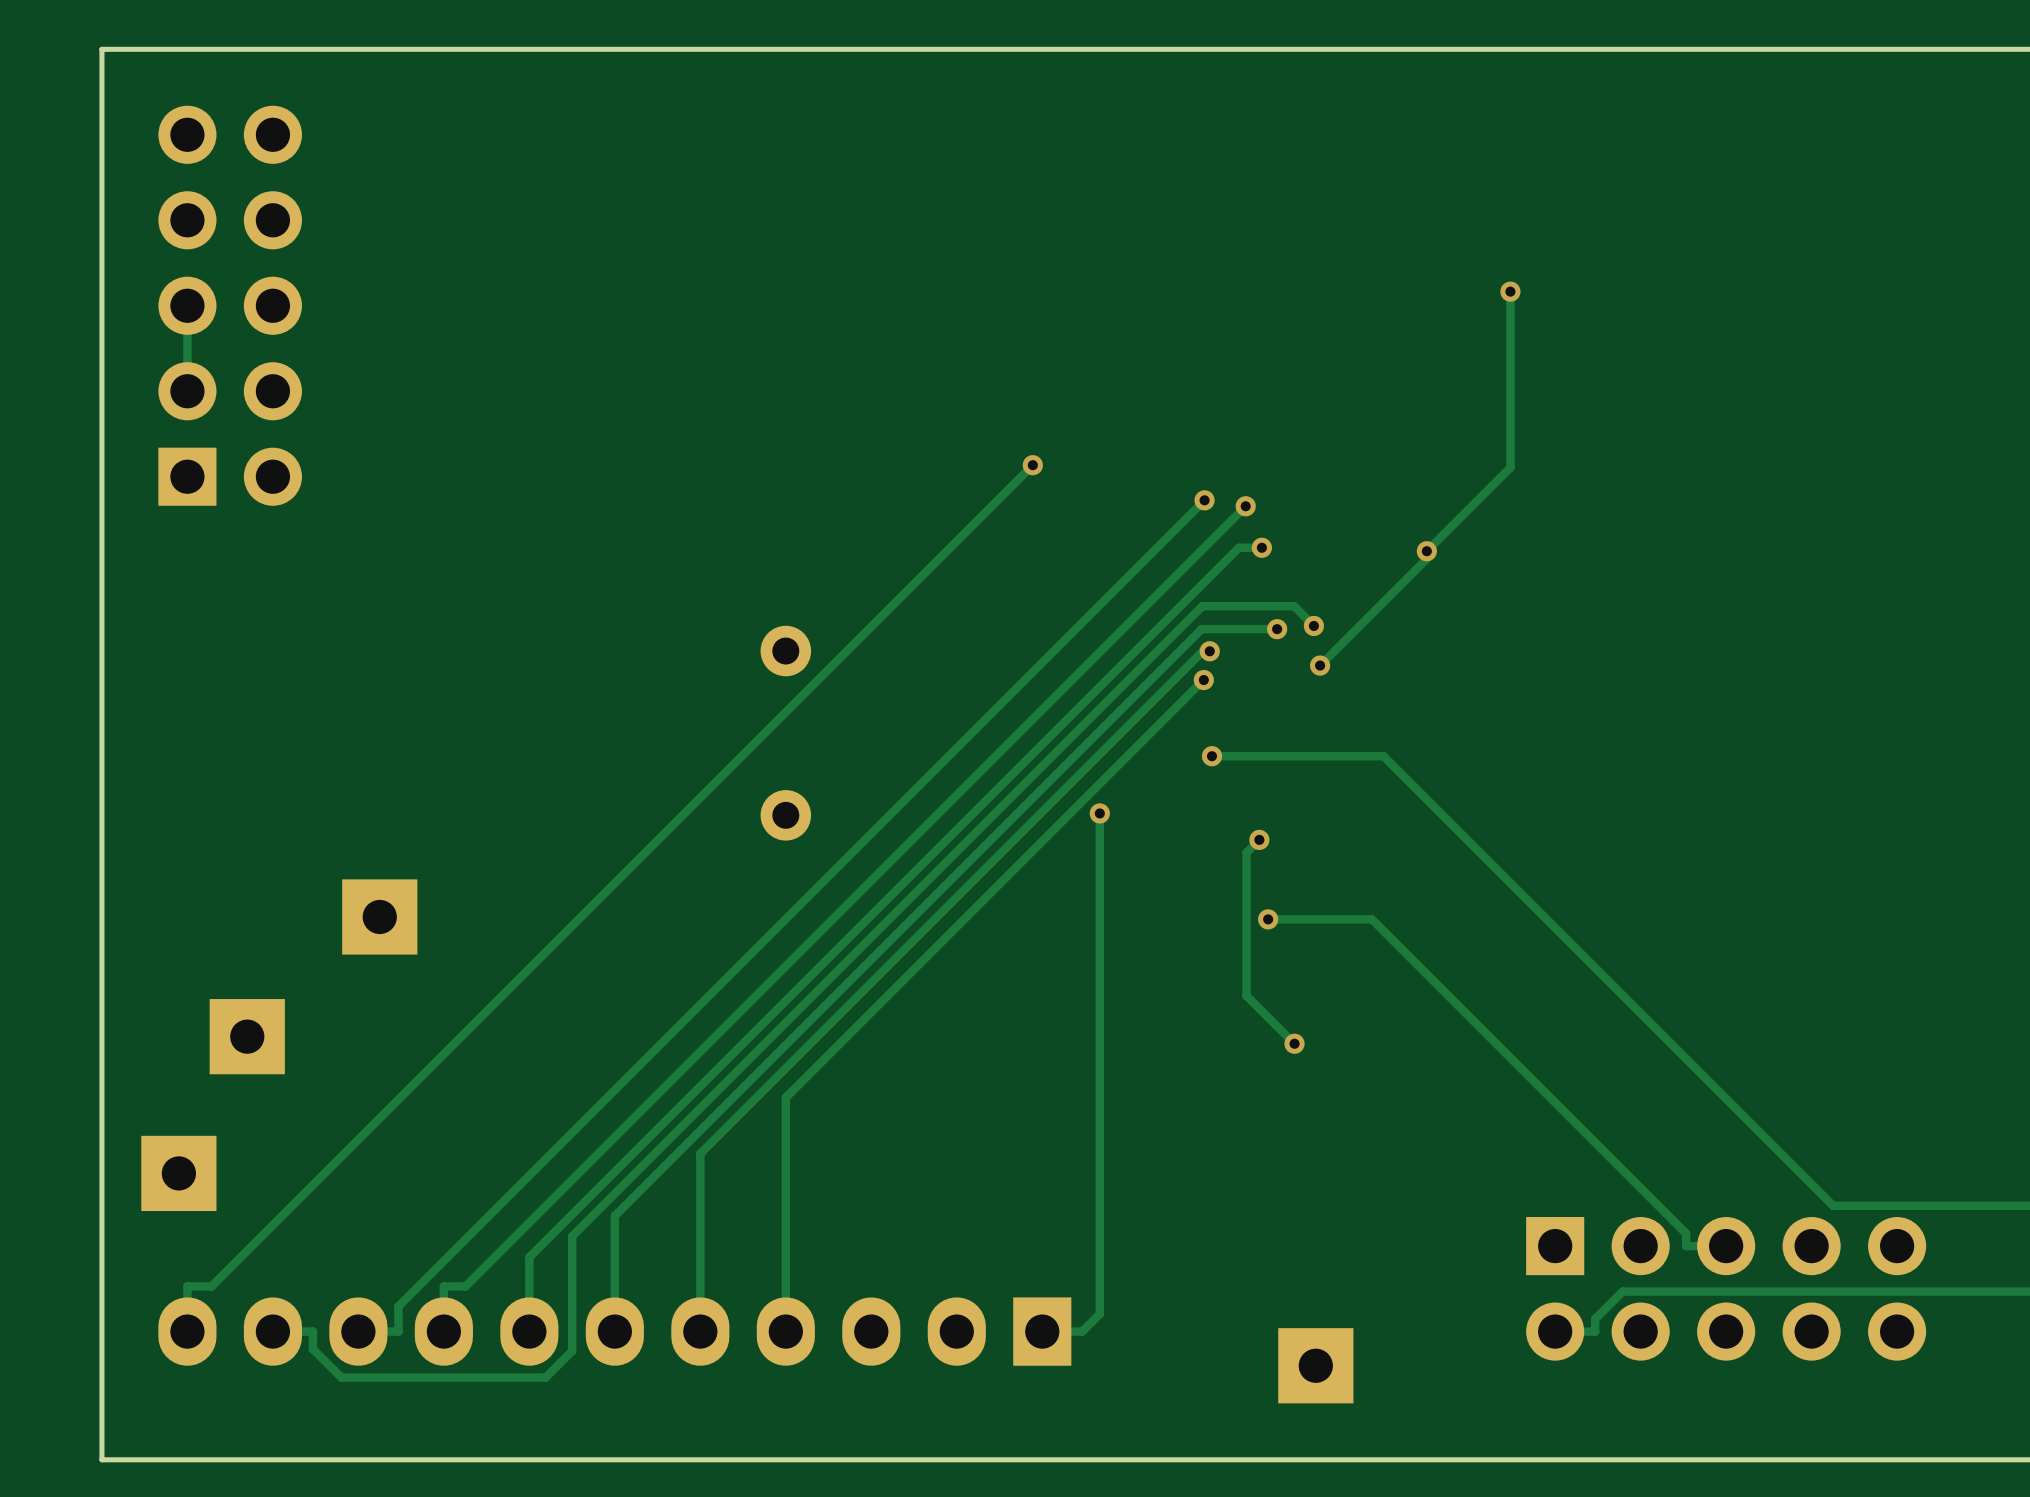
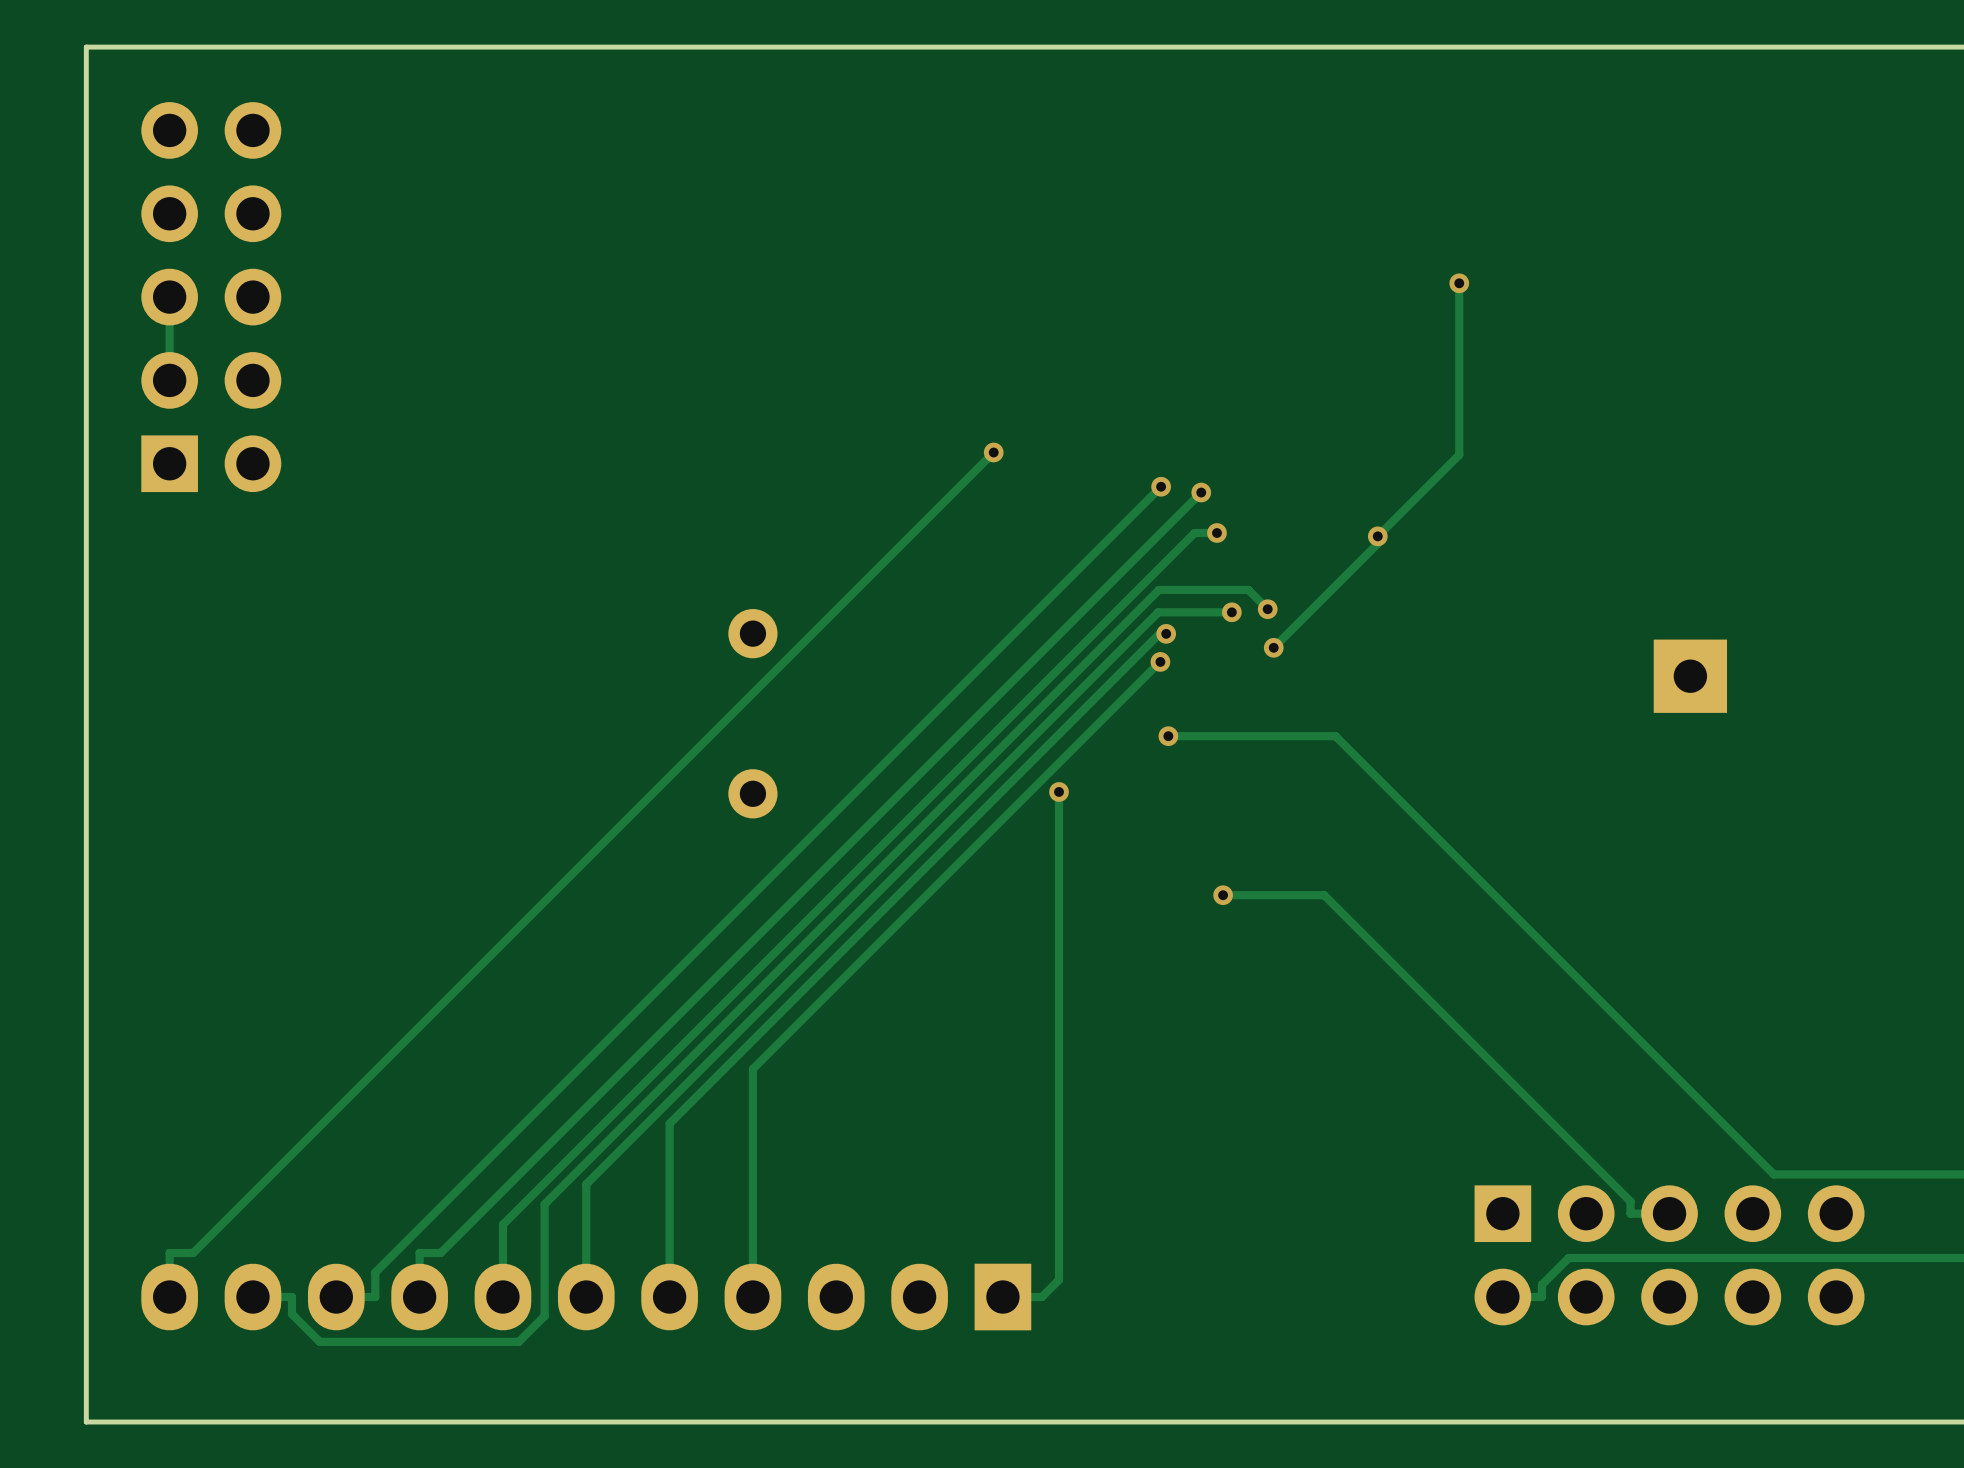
part: none -> (1690, 676)
track: (1259, 839) (1246, 852) (1246, 995) (1294, 1043) -> none
via: (1259, 839) -> none
part: (379, 916) -> none
part: (247, 1036) -> none
via: (1294, 1043) -> none
part: (178, 1173) -> none
part: (1315, 1365) -> none

